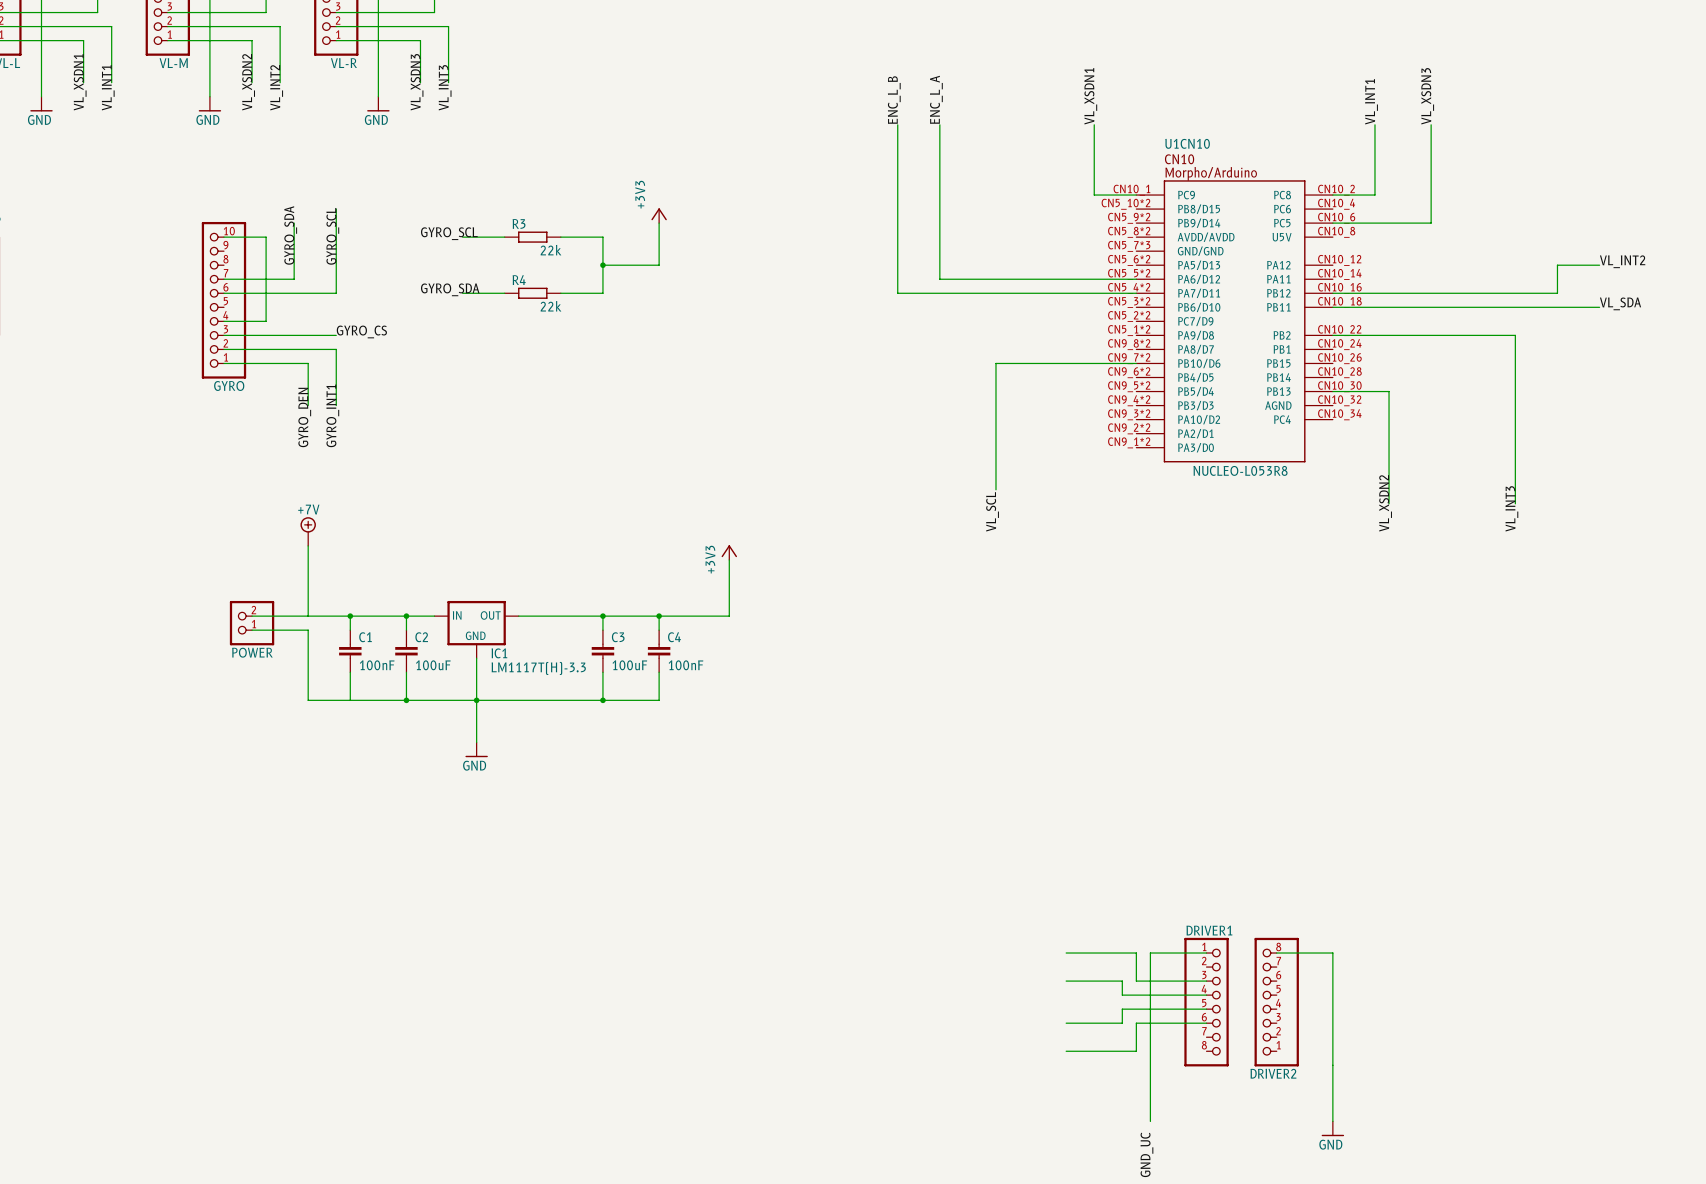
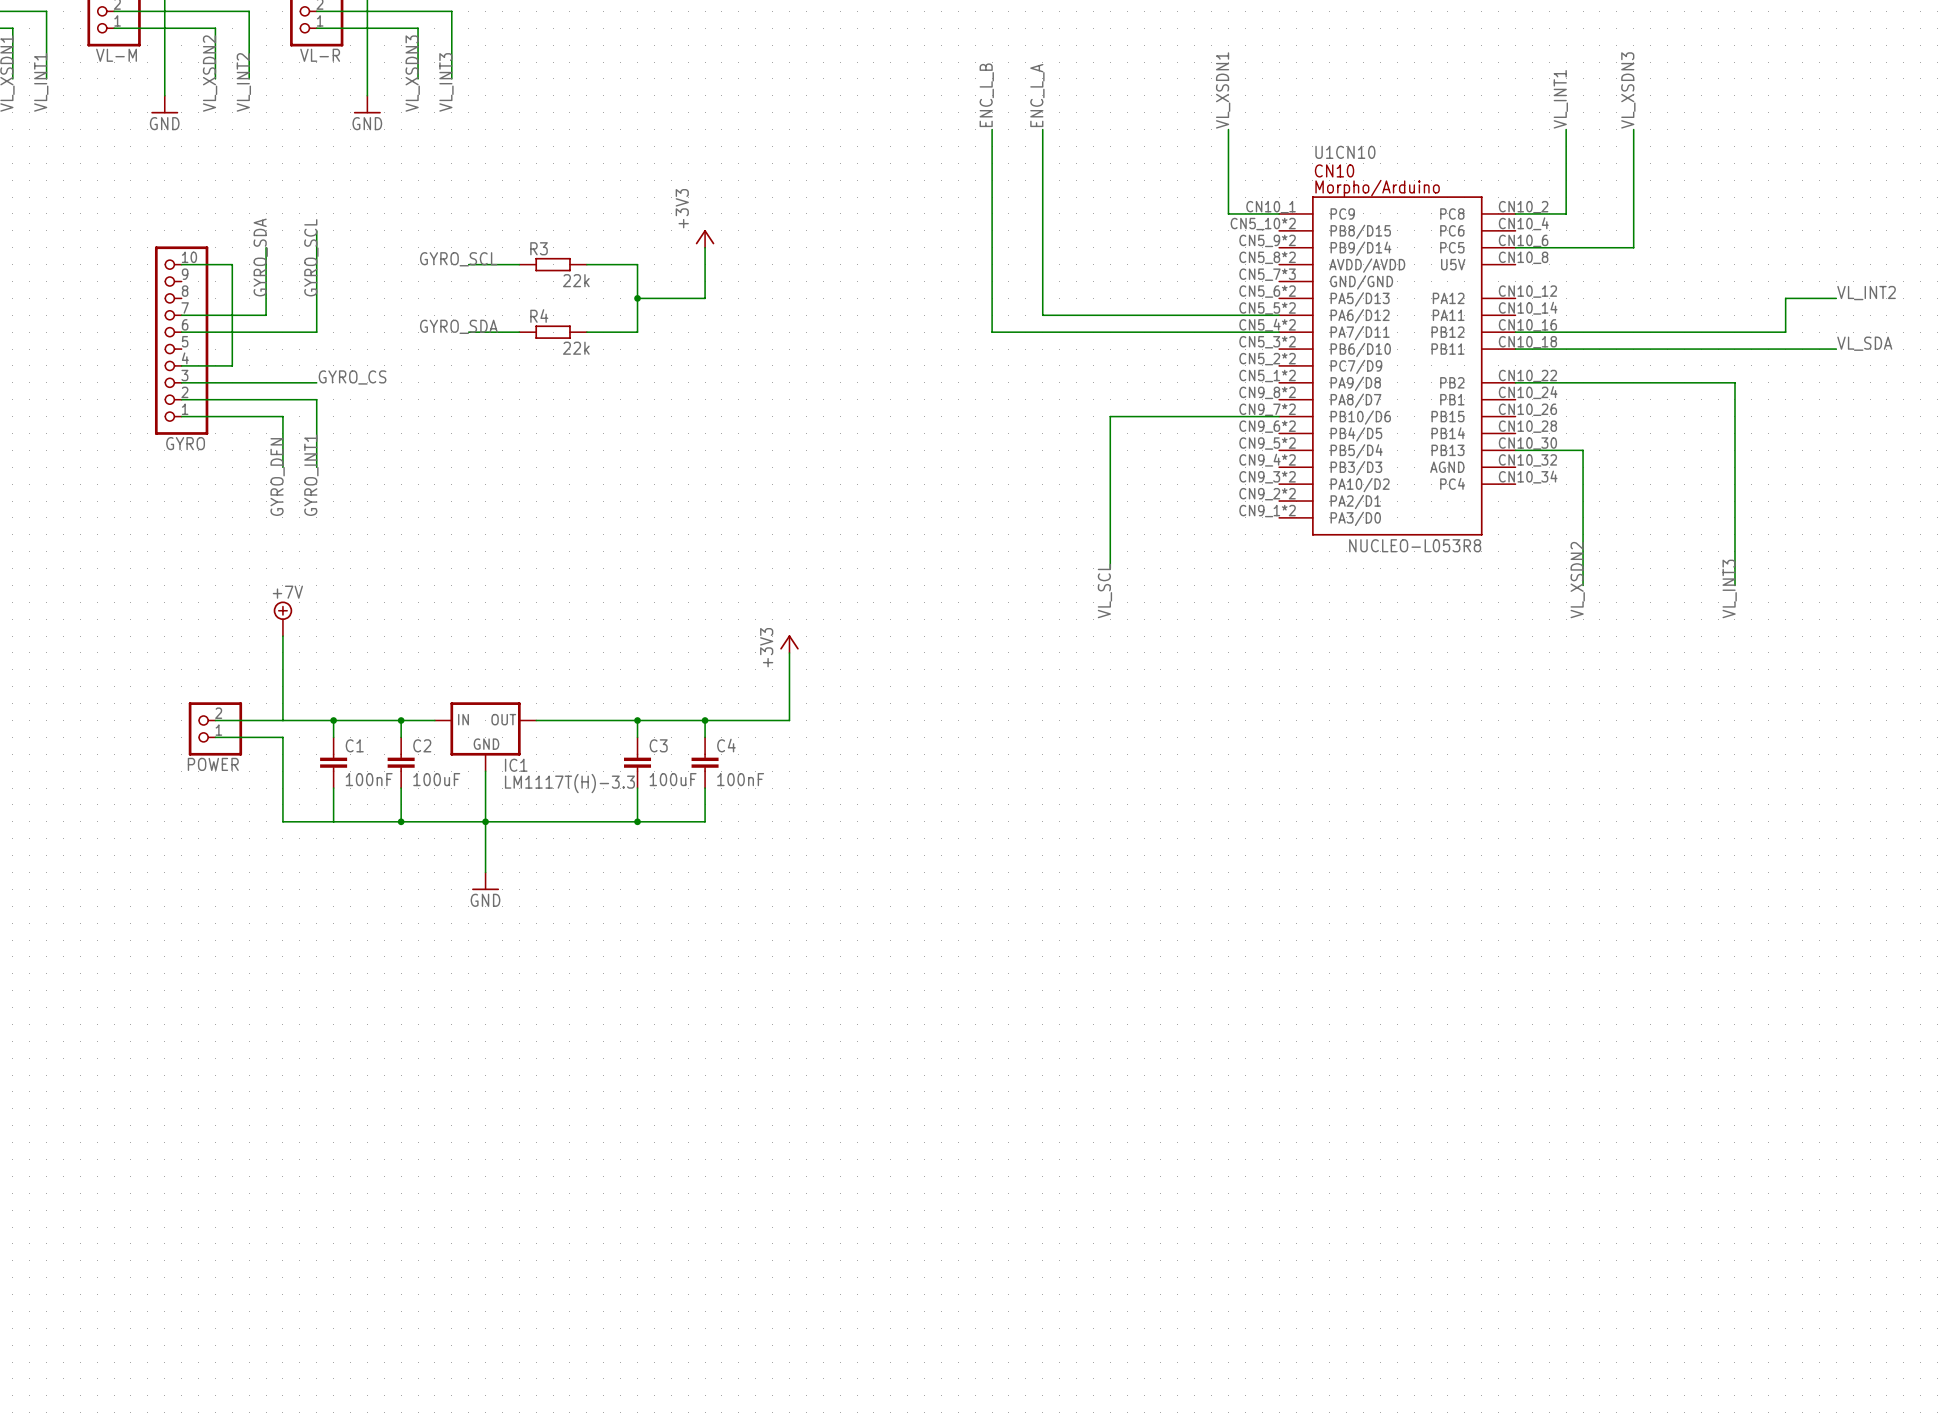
wire: (1066, 953) (1136, 953) (1136, 981) (1206, 981) -> none
wire: (1206, 953) (1150, 953) (1150, 1121) -> none
wire: (1276, 953) (1332, 953) (1332, 1121) -> none
wire: (1066, 981) (1122, 981) (1122, 995) (1206, 995) -> none
DRIVER1: (1206, 1002) -> none
DRIVER2: (1276, 1002) -> none
wire: (1206, 1009) (1122, 1009) (1122, 1023) (1066, 1023) -> none
wire: (1206, 1023) (1136, 1023) (1136, 1051) (1066, 1051) -> none
power symbol: GND (1332, 1128) -> none
label: GND_UC (1146, 1154) -> none

